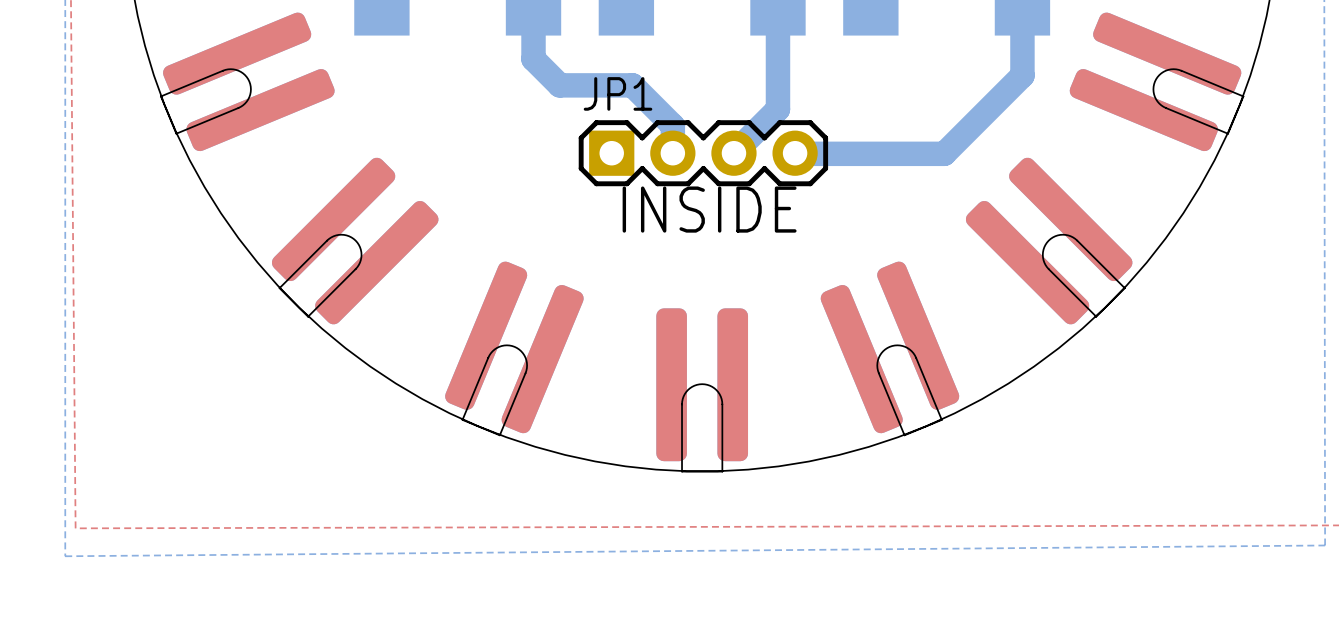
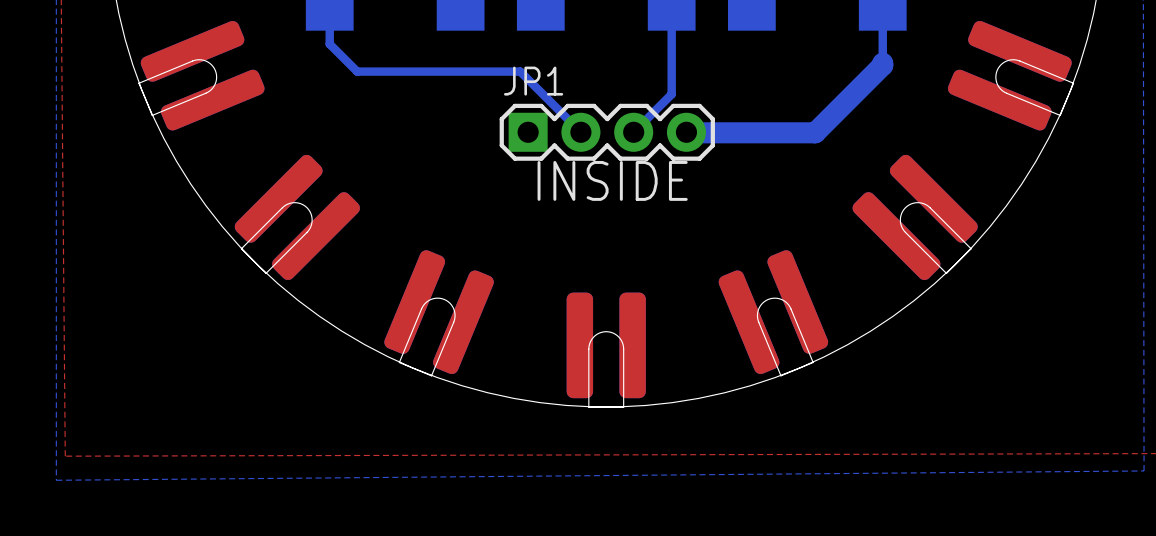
part footprint: [160, 12, 335, 152] -> [138, 20, 265, 131]
part footprint: [1069, 12, 1244, 152] -> [947, 20, 1074, 131]
bottom track: (533, 16) (533, 59) (559, 85) (632, 85) (672, 125) (672, 153) -> (329, 14) (329, 44) (357, 71) (520, 71) (580, 132)
bottom track width: thick (777, 16) (777, 109) (733, 153) -> thin (671, 14) (671, 94) (633, 132)
bottom track width: thick (1022, 16) (1022, 75) -> thin (882, 14) (882, 65)
part footprint: [271, 157, 439, 325] -> [234, 154, 360, 281]
part footprint: [965, 157, 1133, 325] -> [852, 154, 978, 281]
part footprint: [445, 261, 584, 436] -> [384, 250, 494, 376]
part footprint: [820, 261, 960, 436] -> [718, 250, 829, 376]
part footprint: [656, 308, 749, 472] -> [566, 292, 646, 408]

